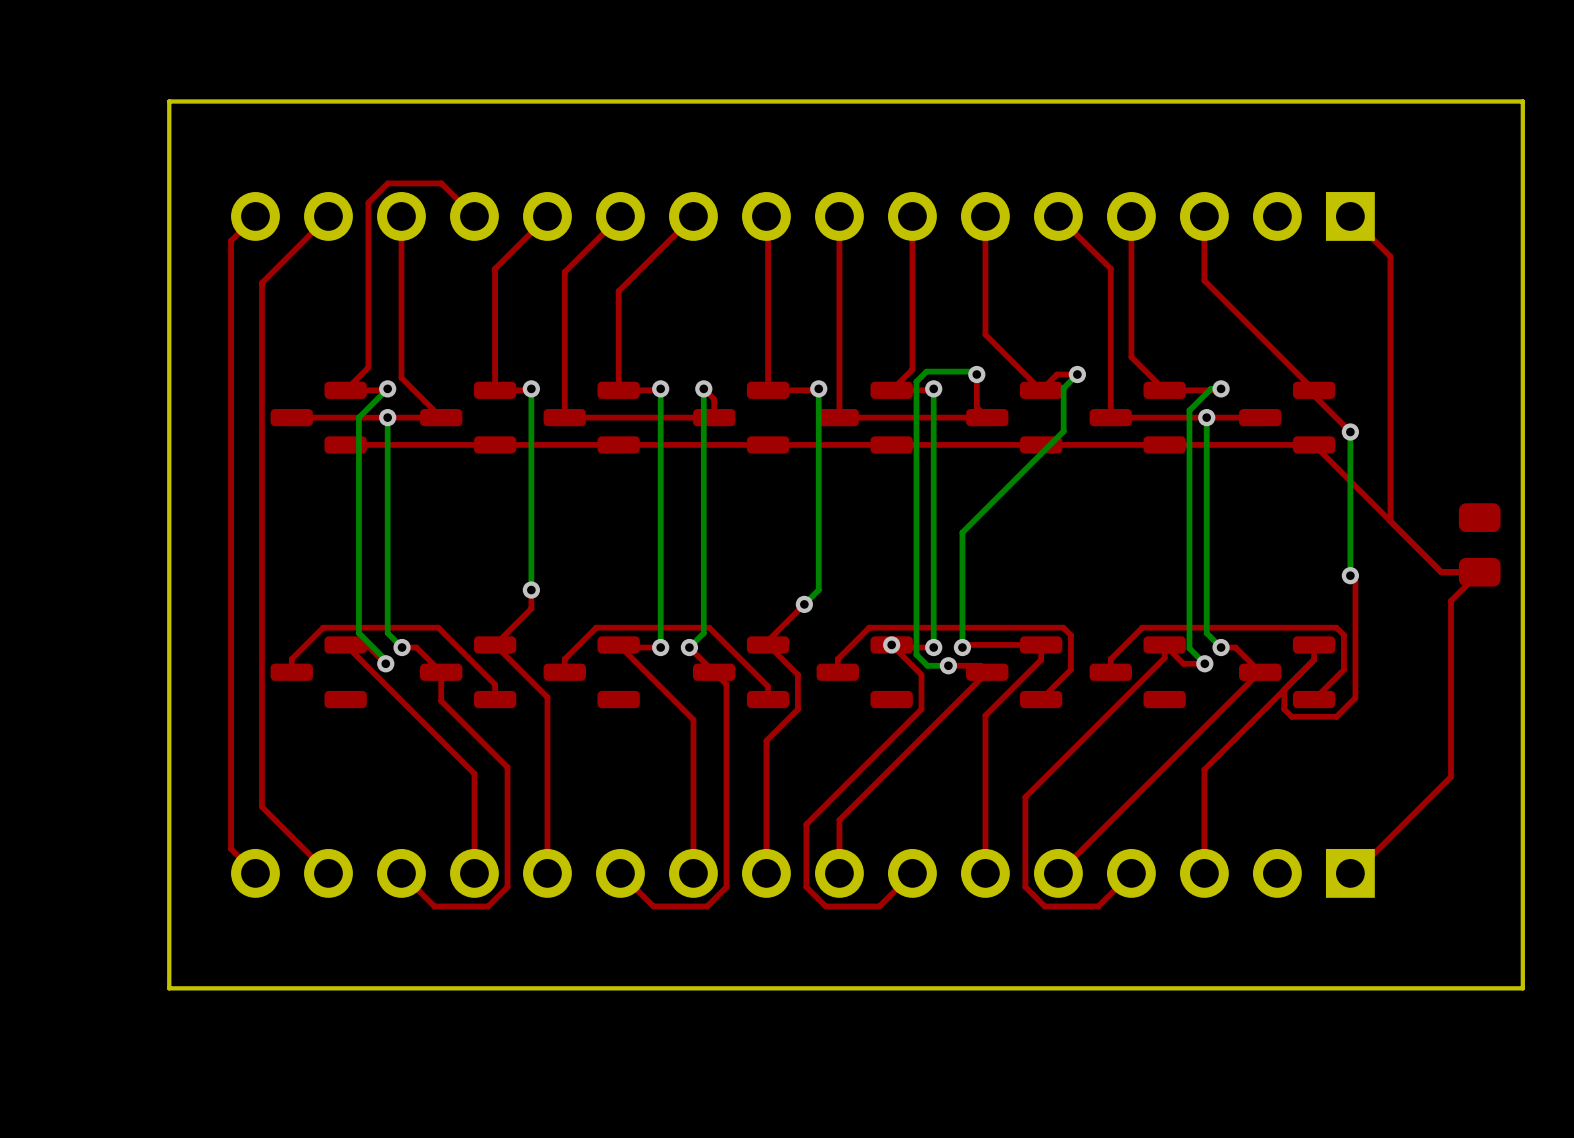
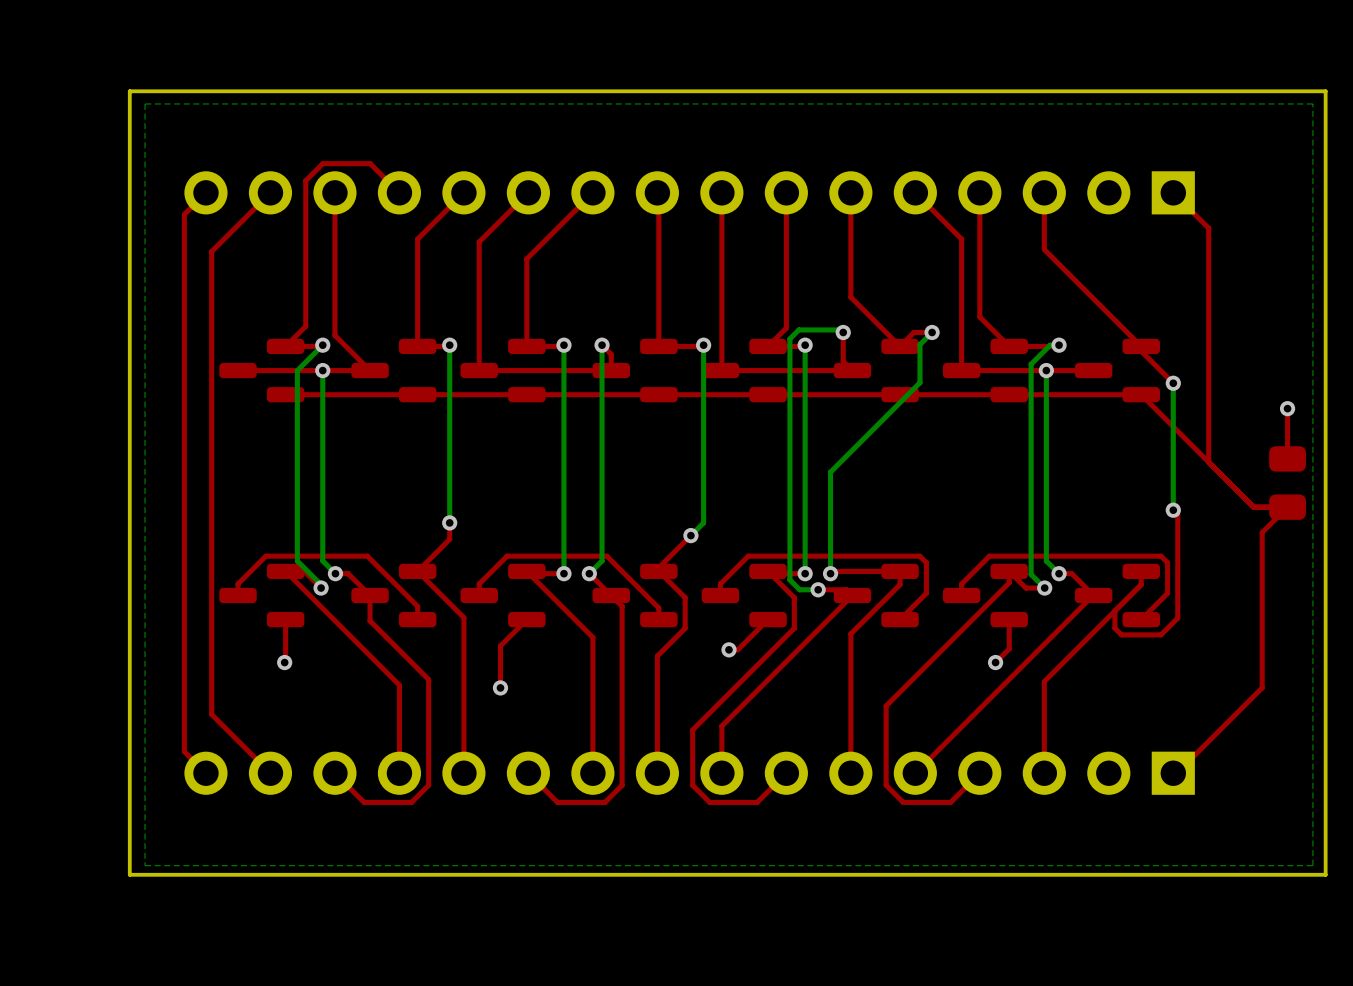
bottom zone outline: none -> (1312, 103) (145, 103) (145, 865) (1312, 865) (1312, 103)
top track: none -> (1287, 408) (1287, 458)
via: none -> (1287, 408)
via position: (891, 644) -> (728, 649)
top track: none -> (285, 619) (284, 662)
top track: none -> (526, 619) (500, 645) (500, 687)
top track: none -> (768, 619) (737, 649) (728, 649)
top track: none -> (1009, 619) (1009, 648) (995, 662)
via: none -> (284, 662)
via: none -> (995, 662)
via: none -> (500, 687)

